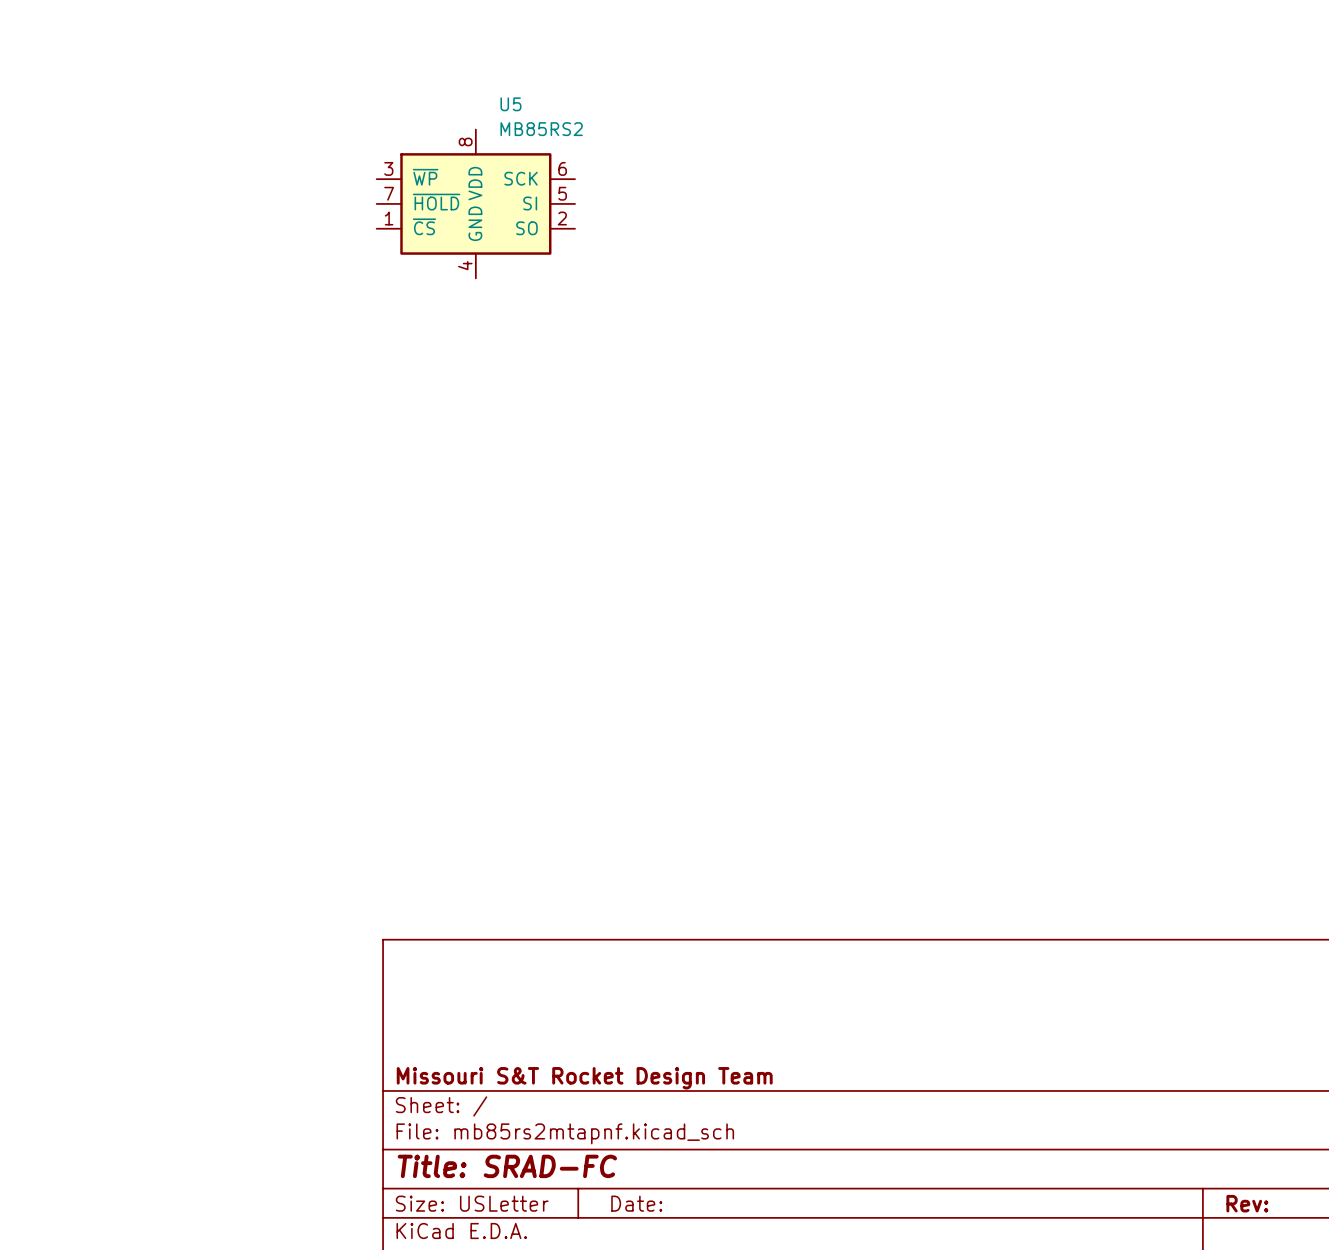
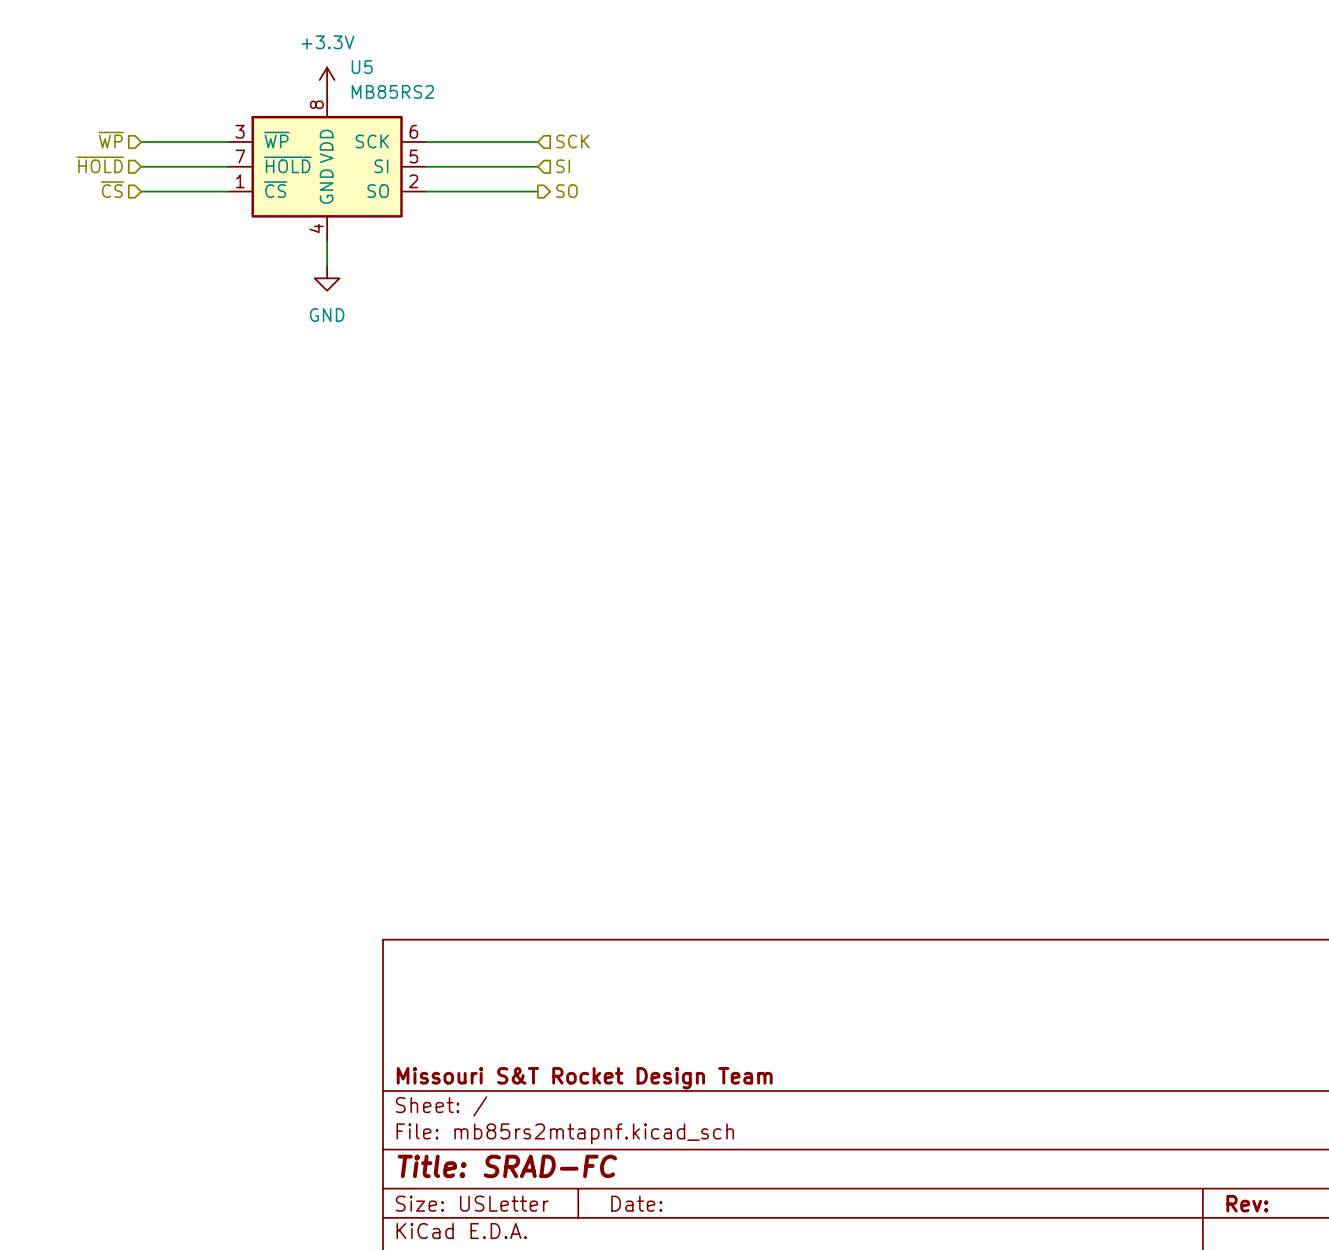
power symbol: none -> +3.3V (327, 79)
hierarchical label: none -> ~{WP} (111, 140)
wire: none -> (141, 141) (227, 141)
wire: none -> (426, 141) (537, 141)
hierarchical label: none -> SCK (572, 141)
hierarchical label: none -> ~{HOLD} (100, 164)
wire: none -> (141, 166) (227, 166)
hierarchical label: none -> SI (563, 166)
hierarchical label: none -> ~{CS} (112, 189)
wire: none -> (141, 191) (227, 191)
hierarchical label: none -> SO (566, 191)
U5 position: (475, 203) -> (327, 166)
wire: none -> (327, 241) (327, 265)
power symbol: none -> GND (327, 278)

